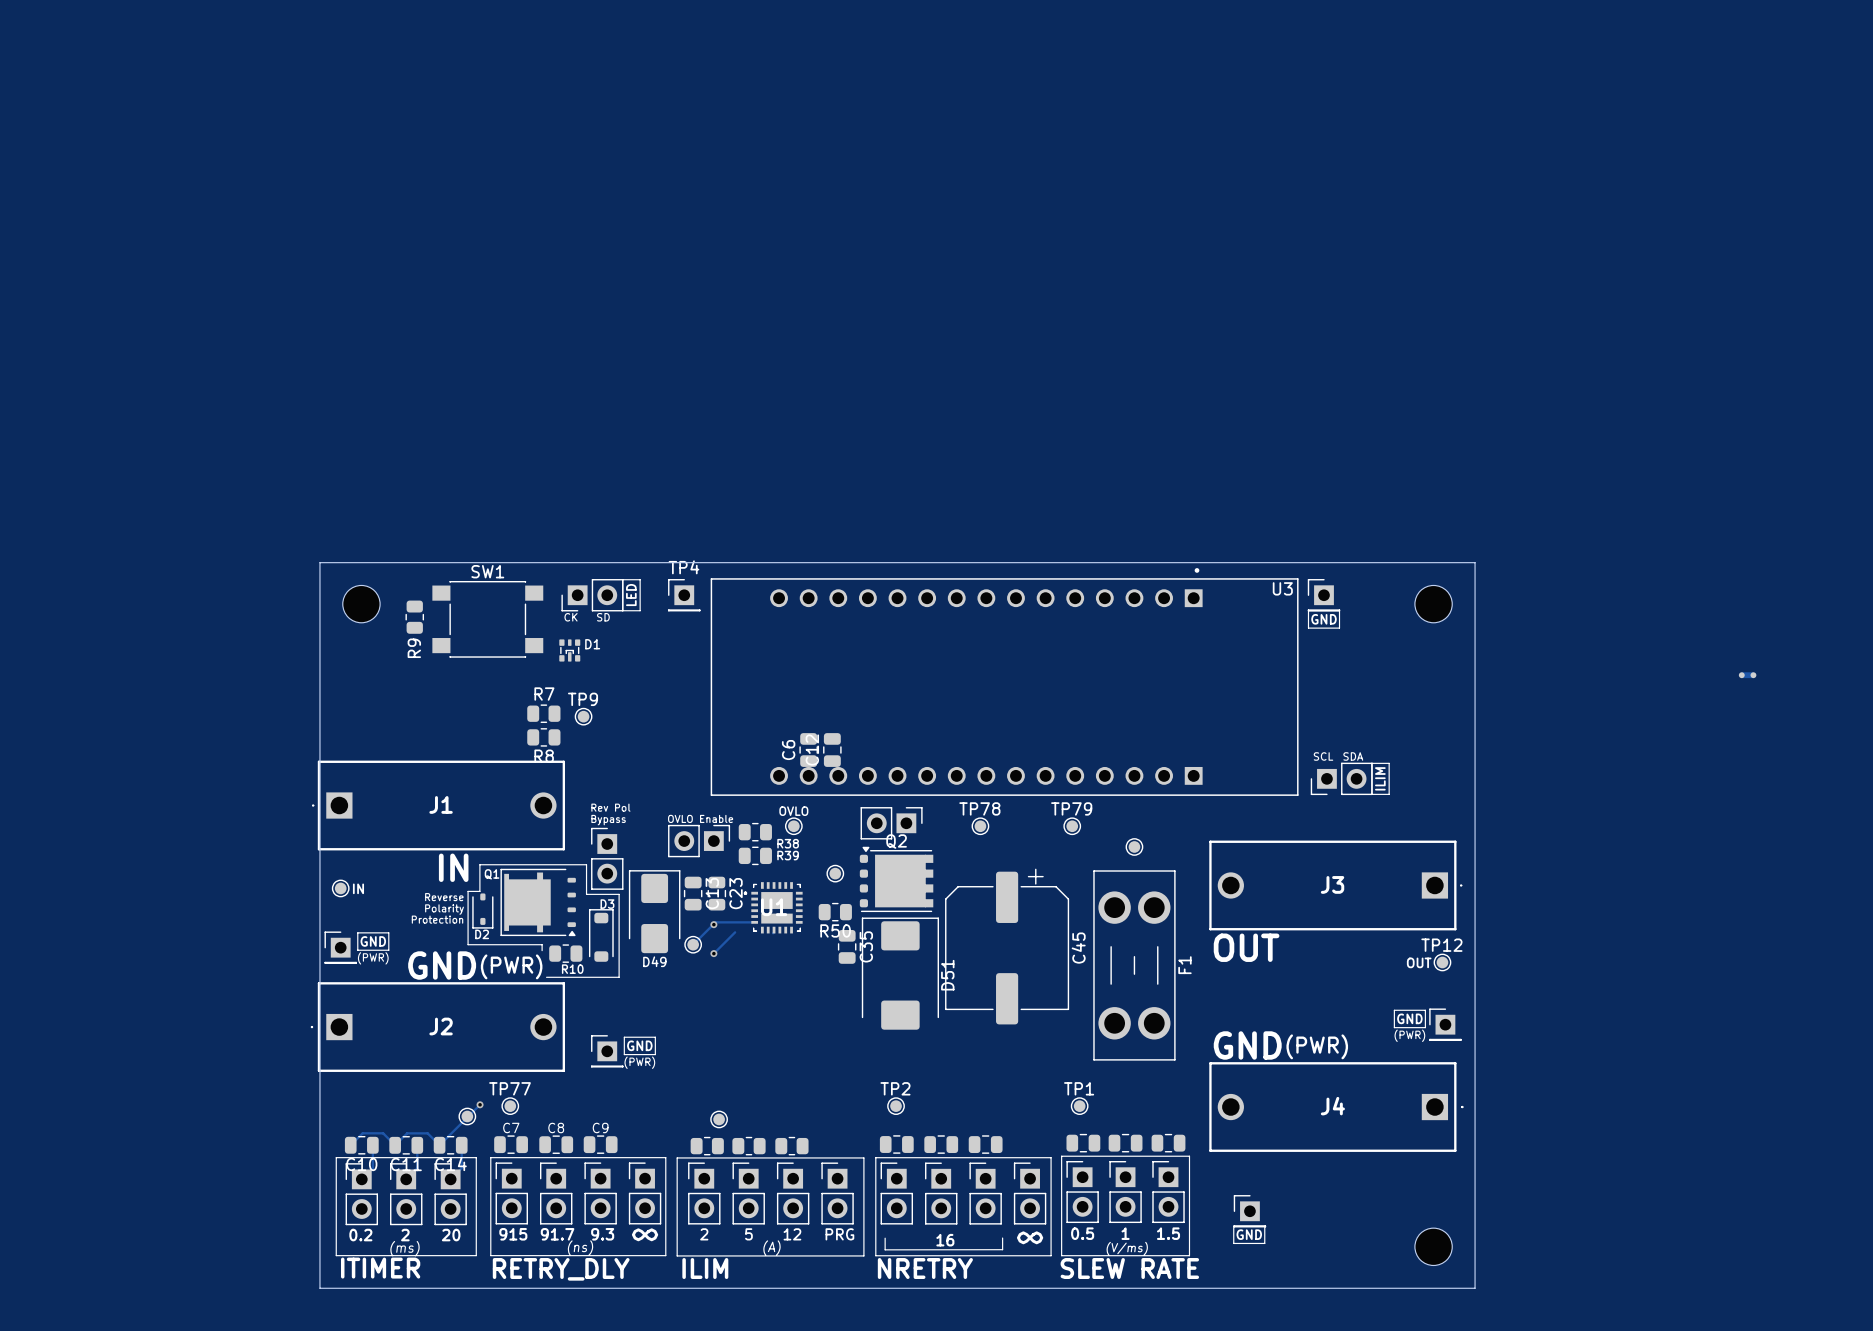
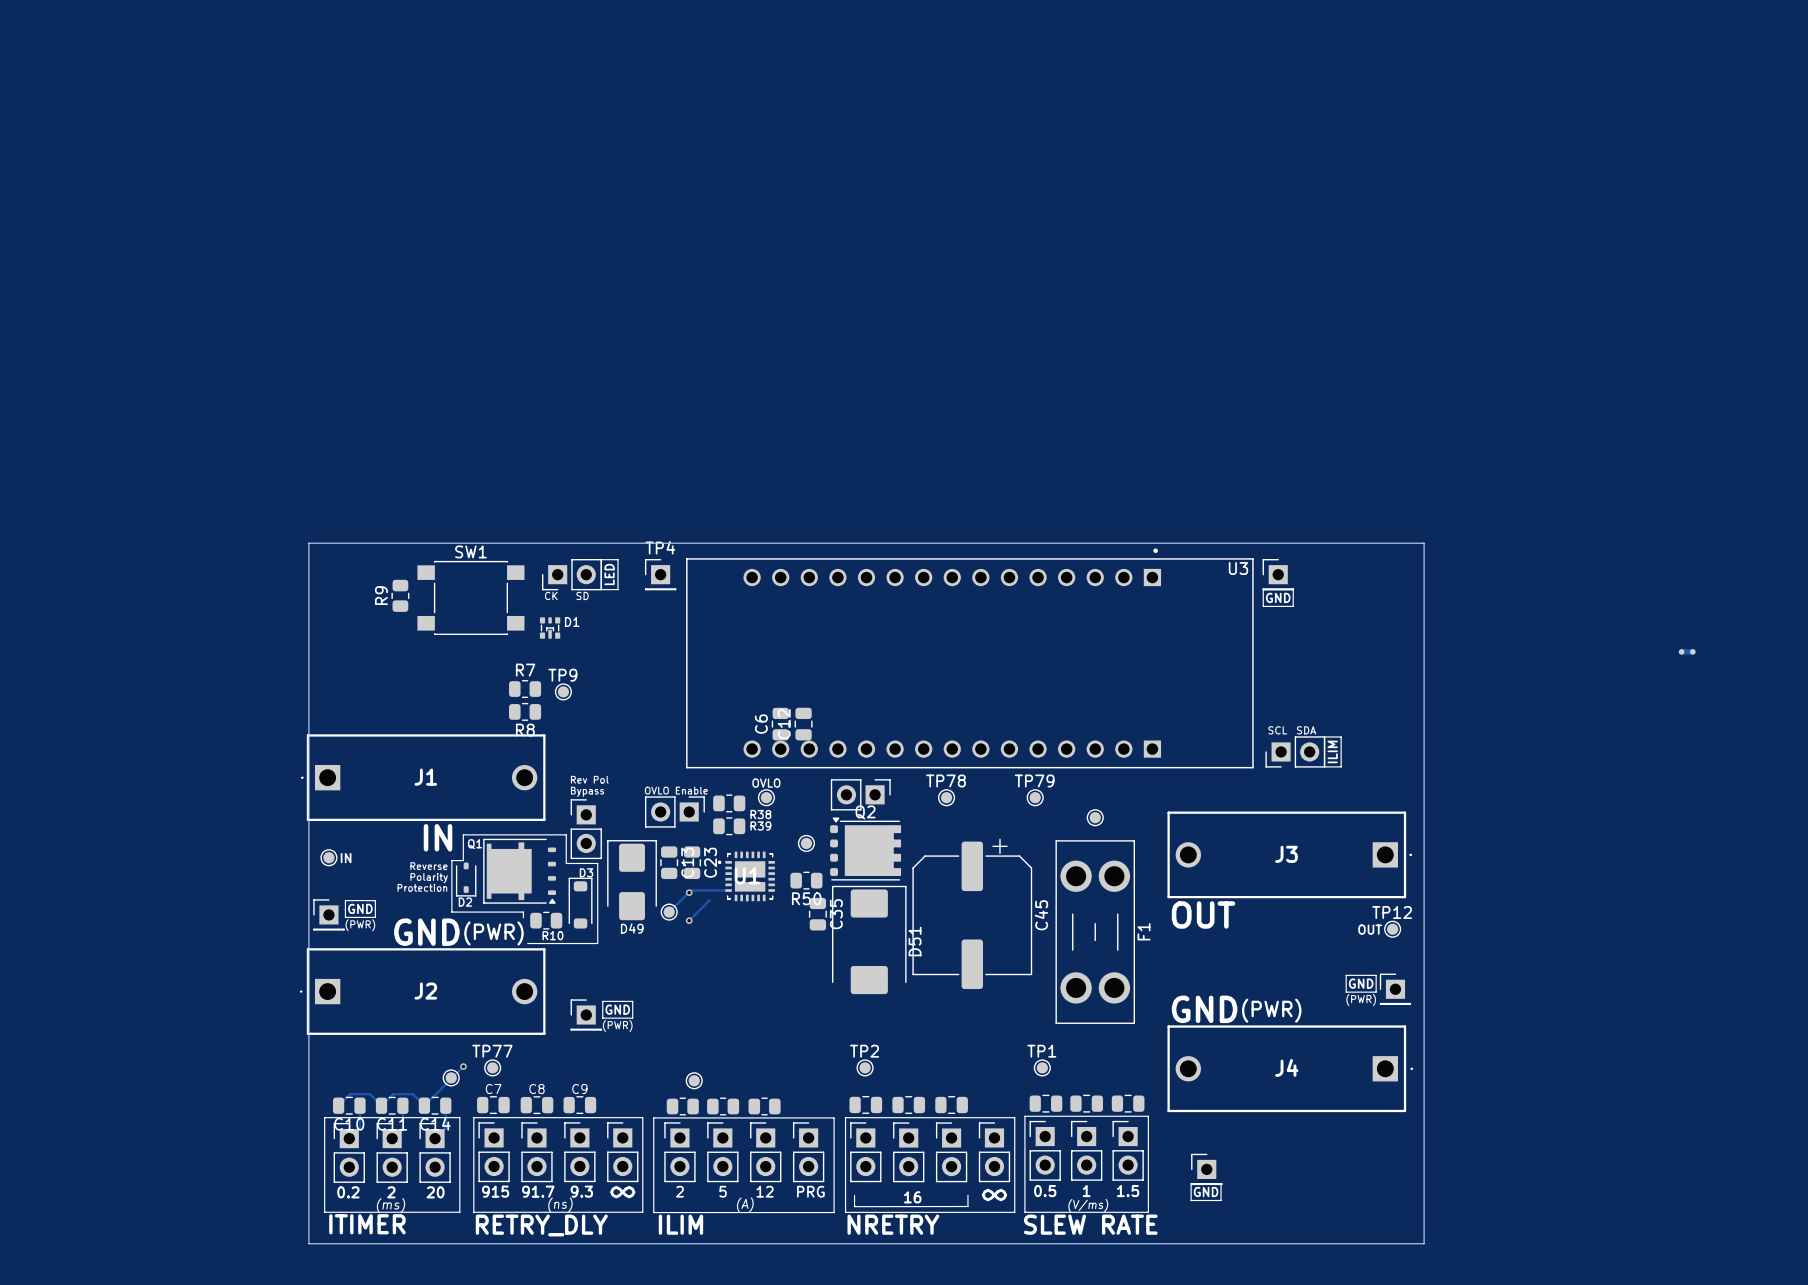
part: (361, 604) -> none
part: (1433, 604) -> none
R9 name position: R9 (414, 648) -> R9 (381, 595)
part: (1433, 1246) -> none

